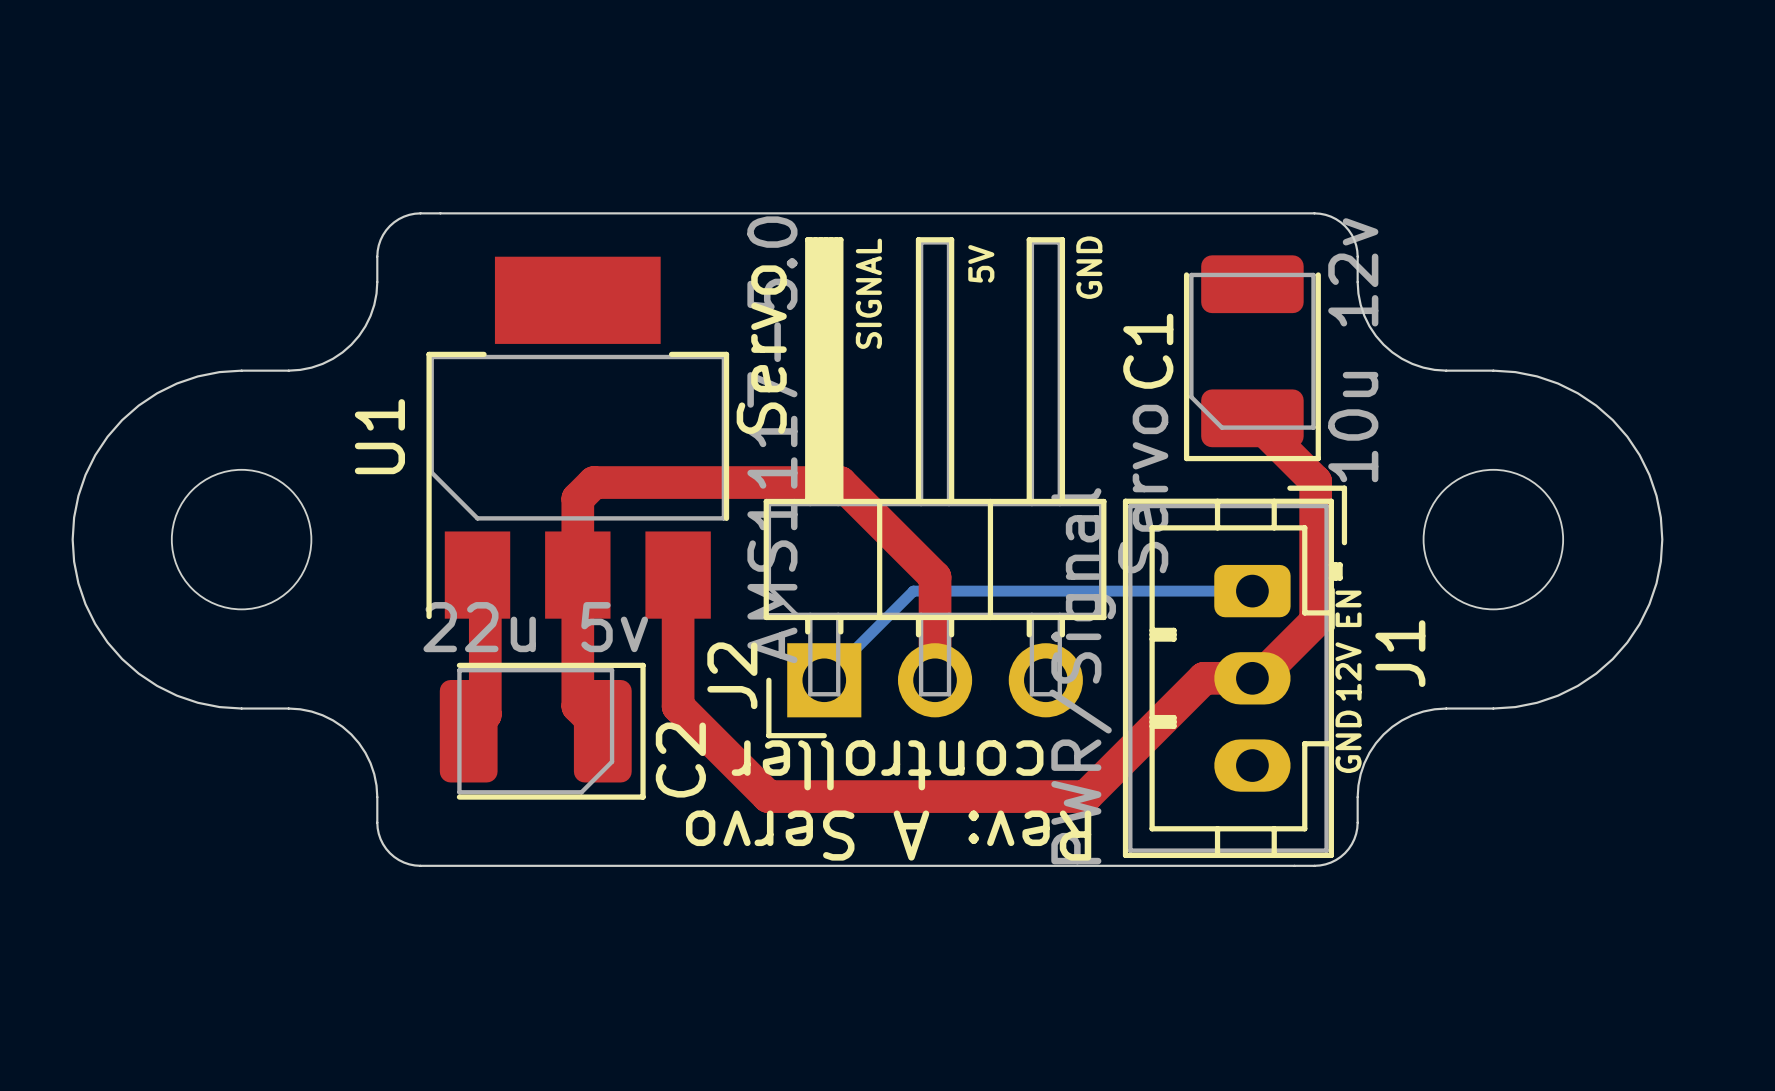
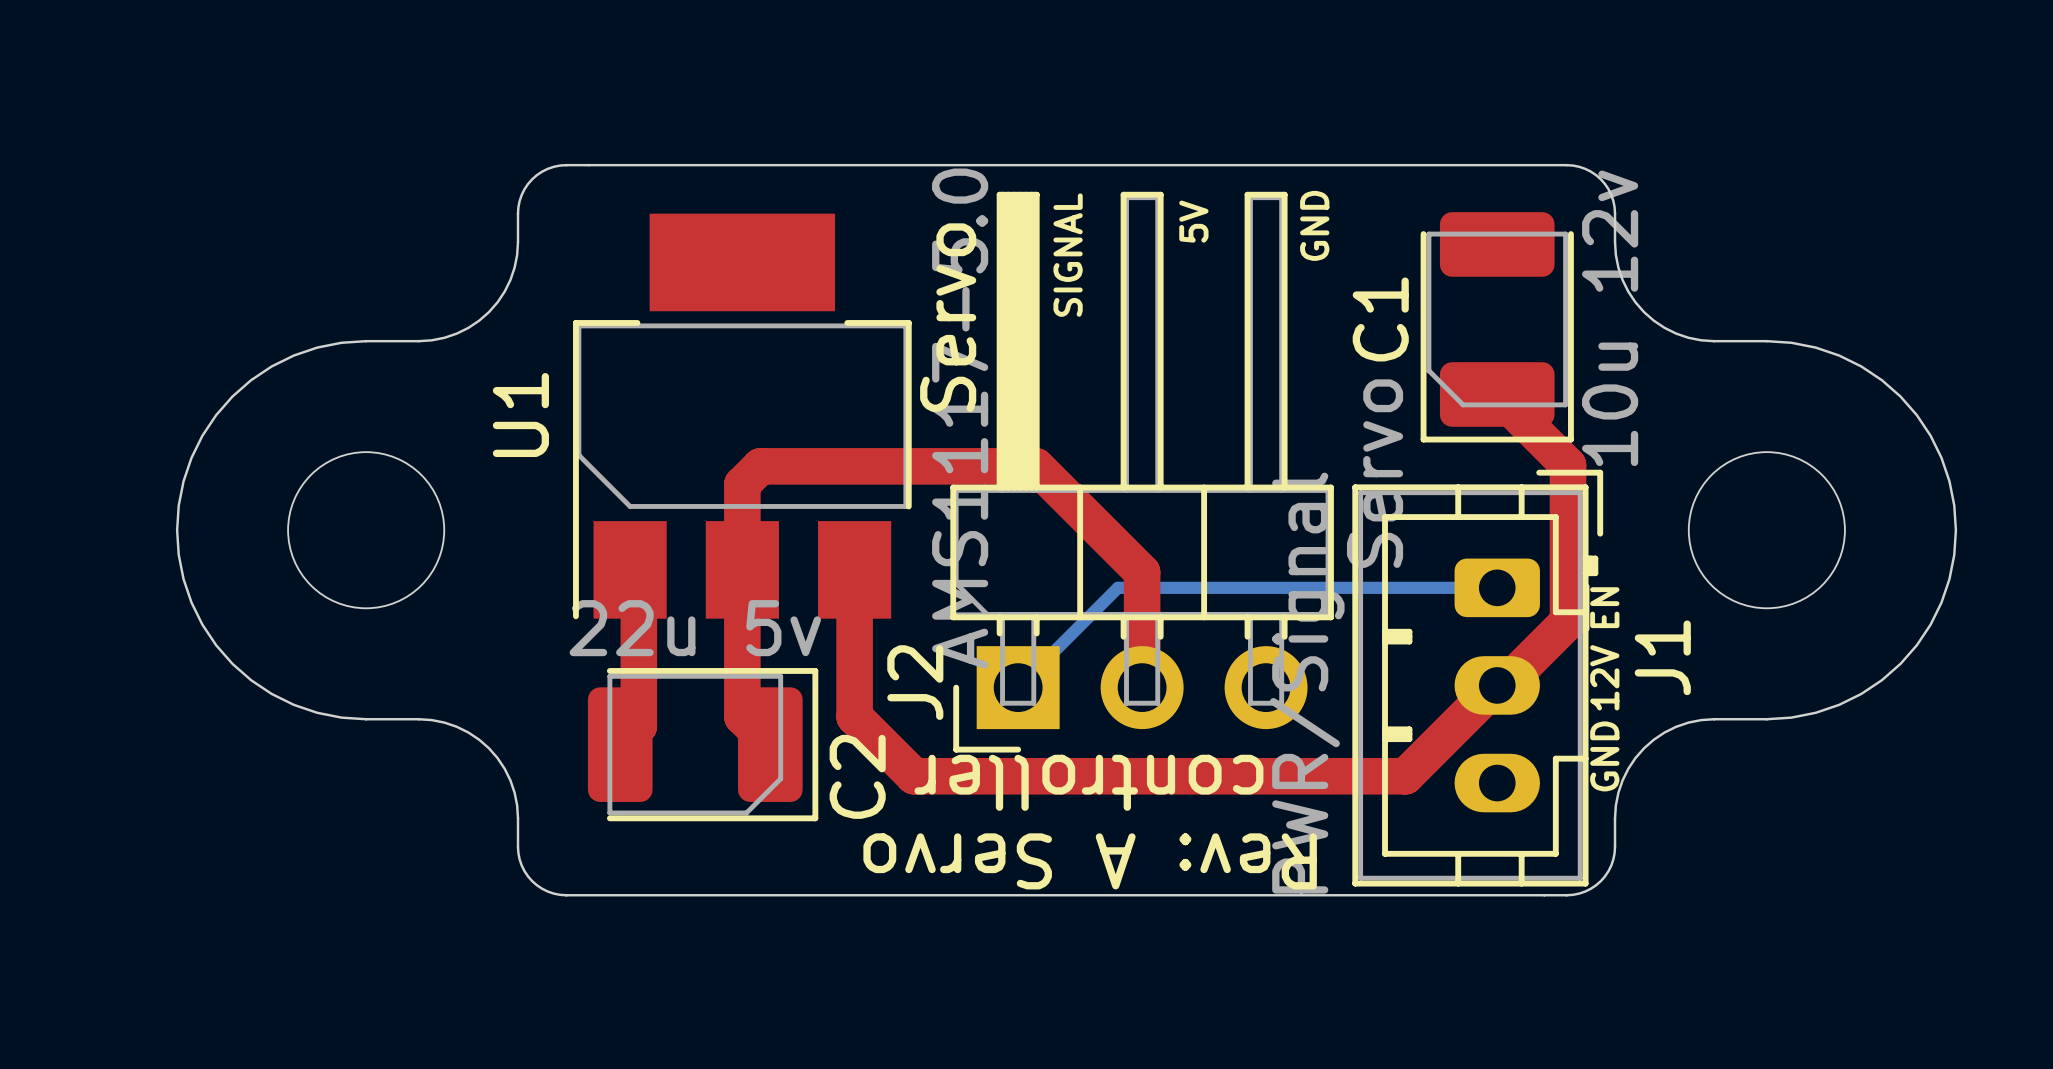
top track: (1251, 678) (1203, 678) (1085, 796) (768, 796) (731, 759) -> (1496, 685) (1405, 776) (914, 776)

